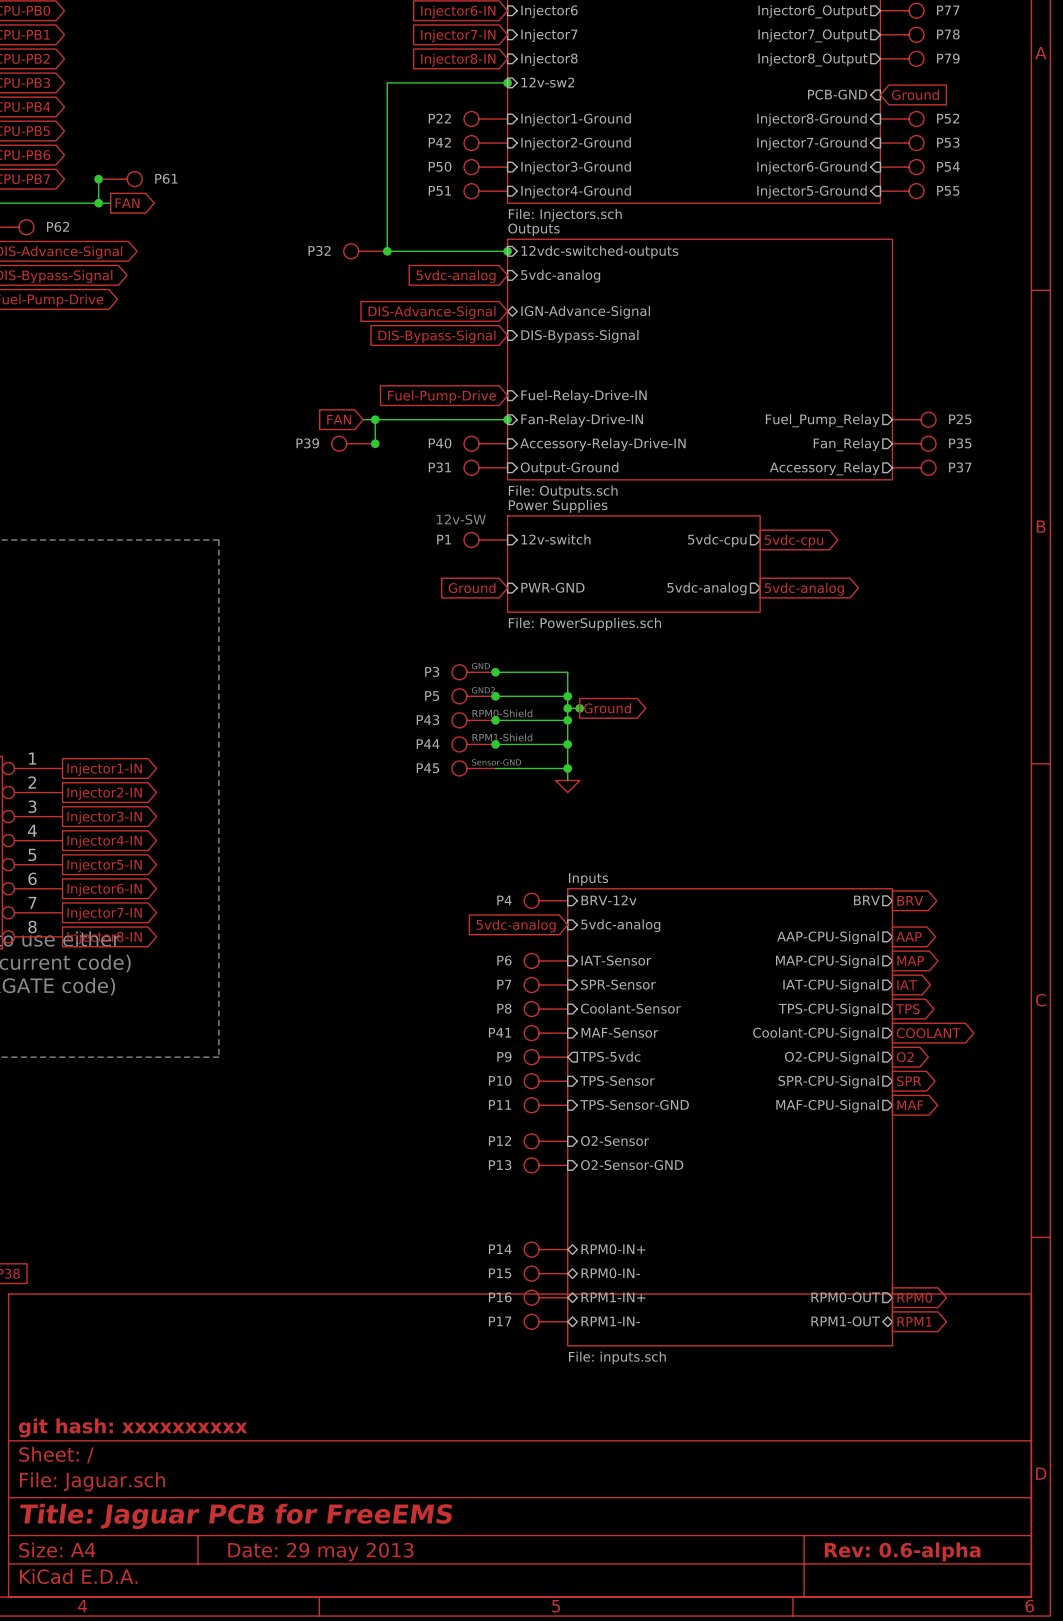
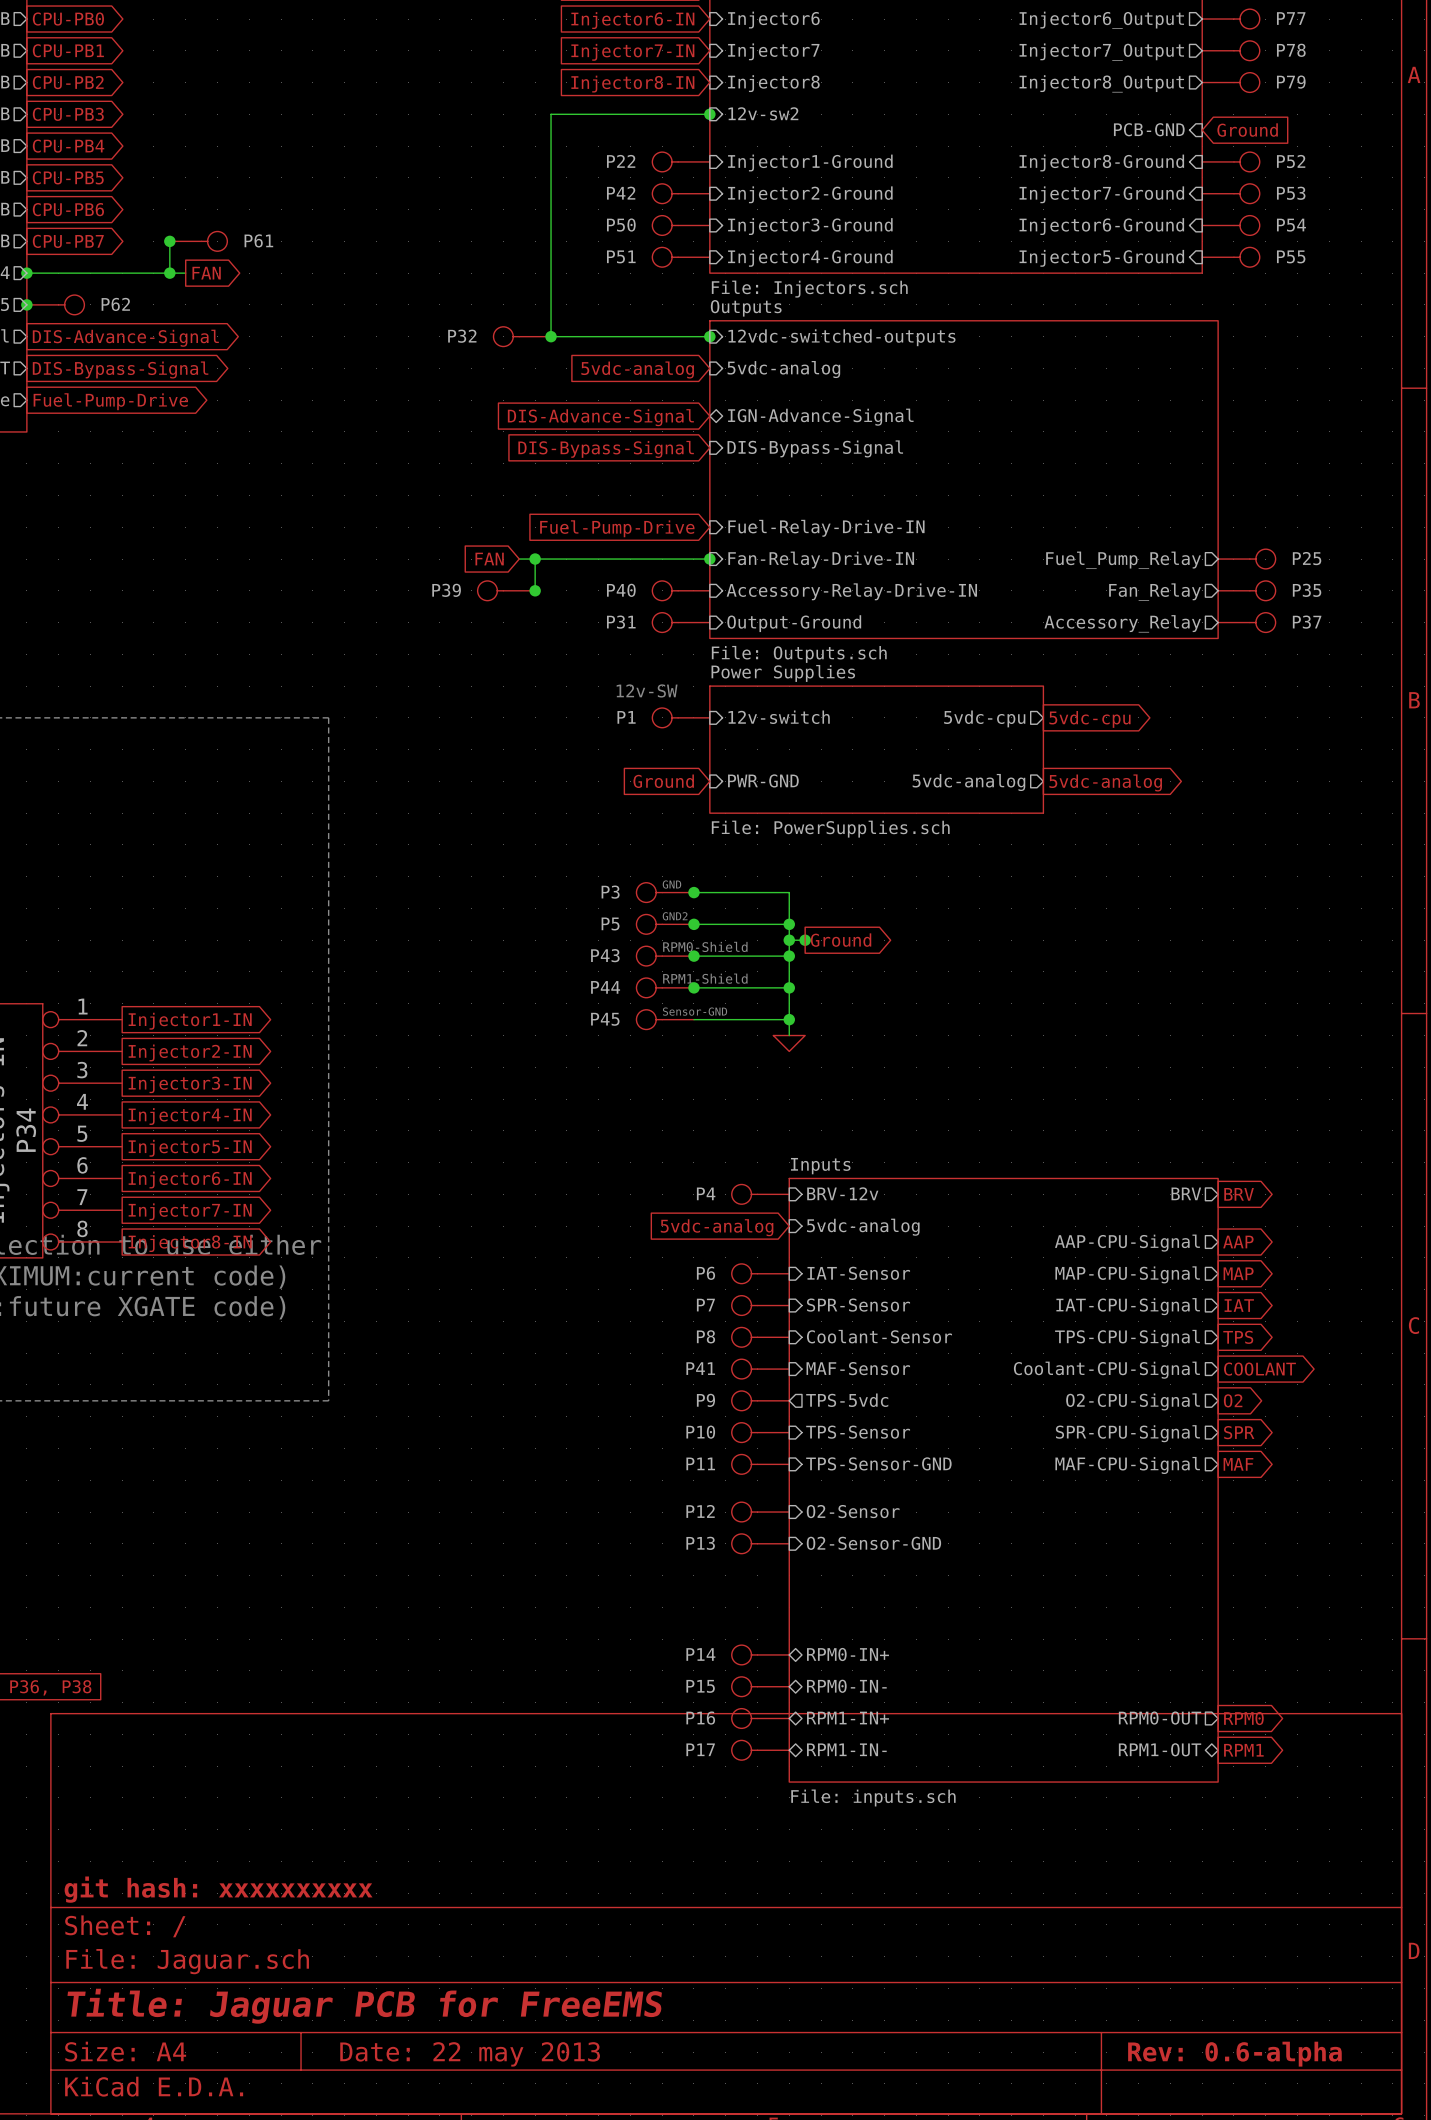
title block: Date: 29 may 2013 (320, 1552) -> Date: 22 may 2013 (470, 2054)

